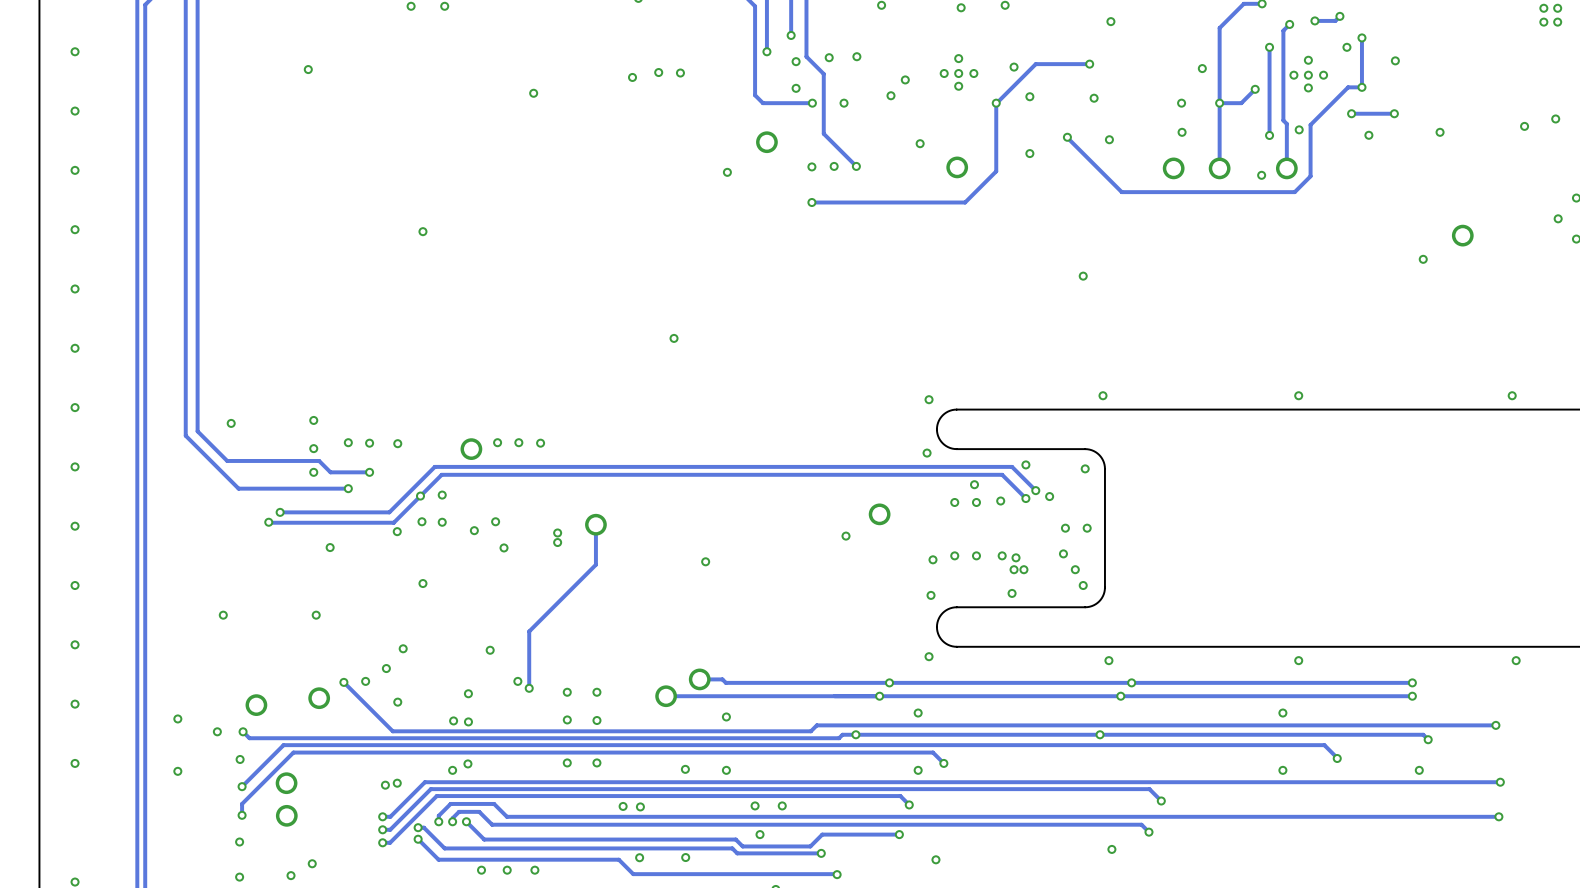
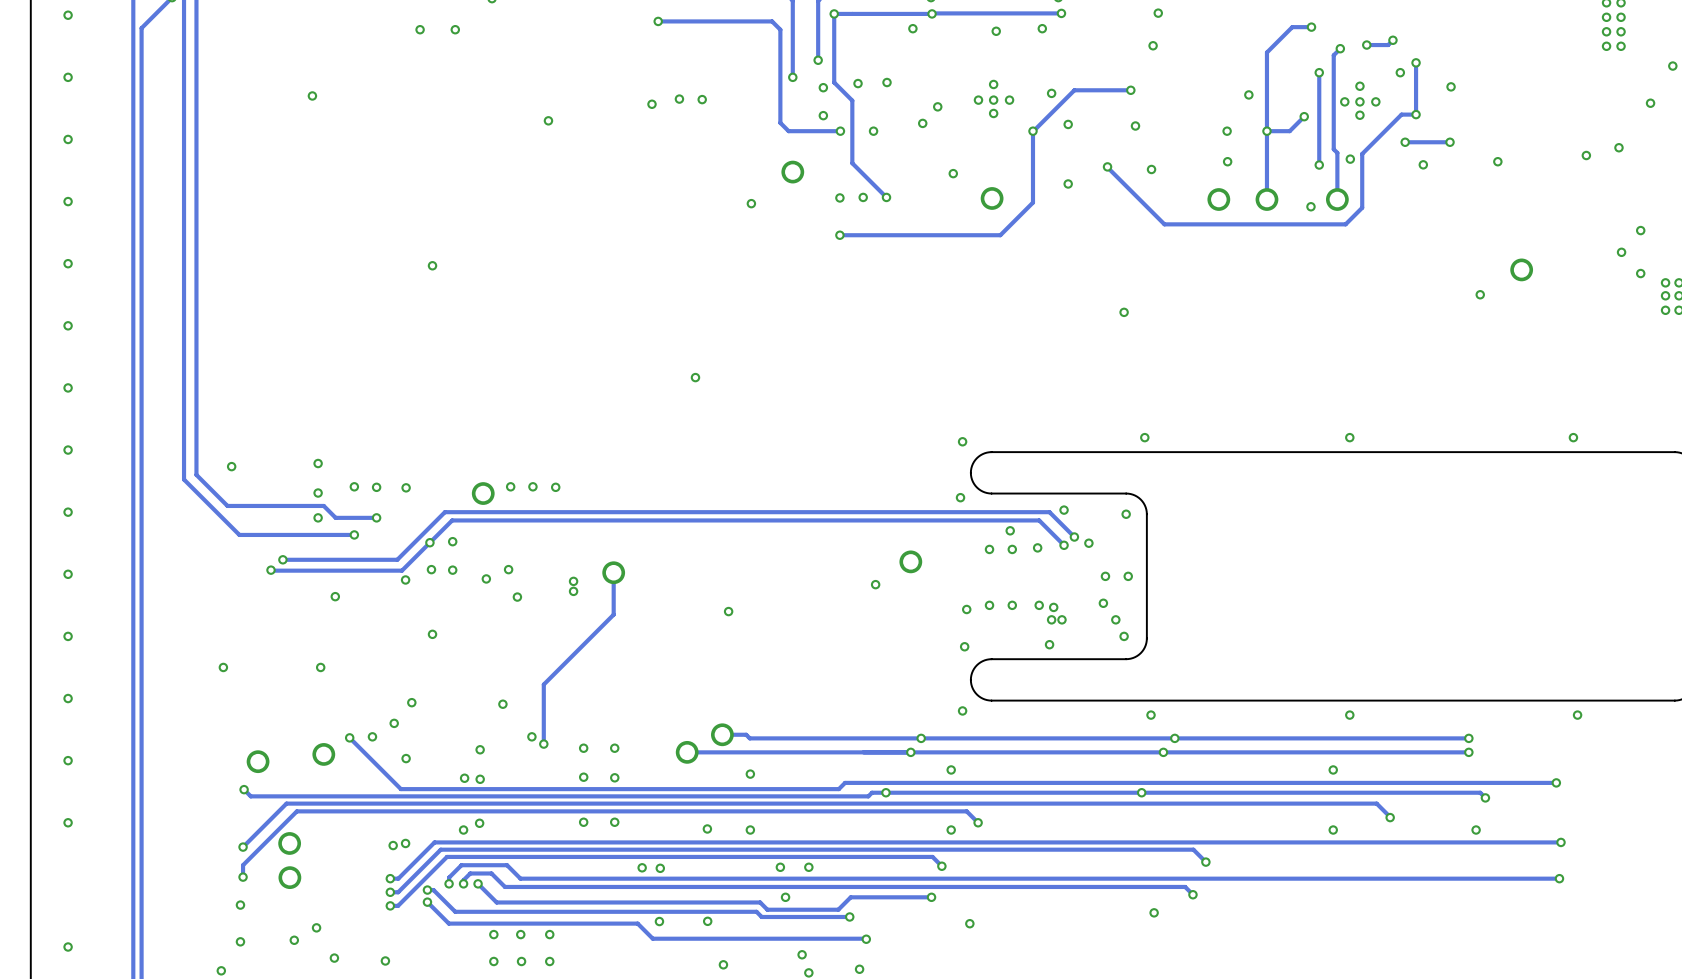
via: (177, 718) -> none
via: (217, 731) -> none
via: (240, 759) -> none
via: (177, 771) -> none

